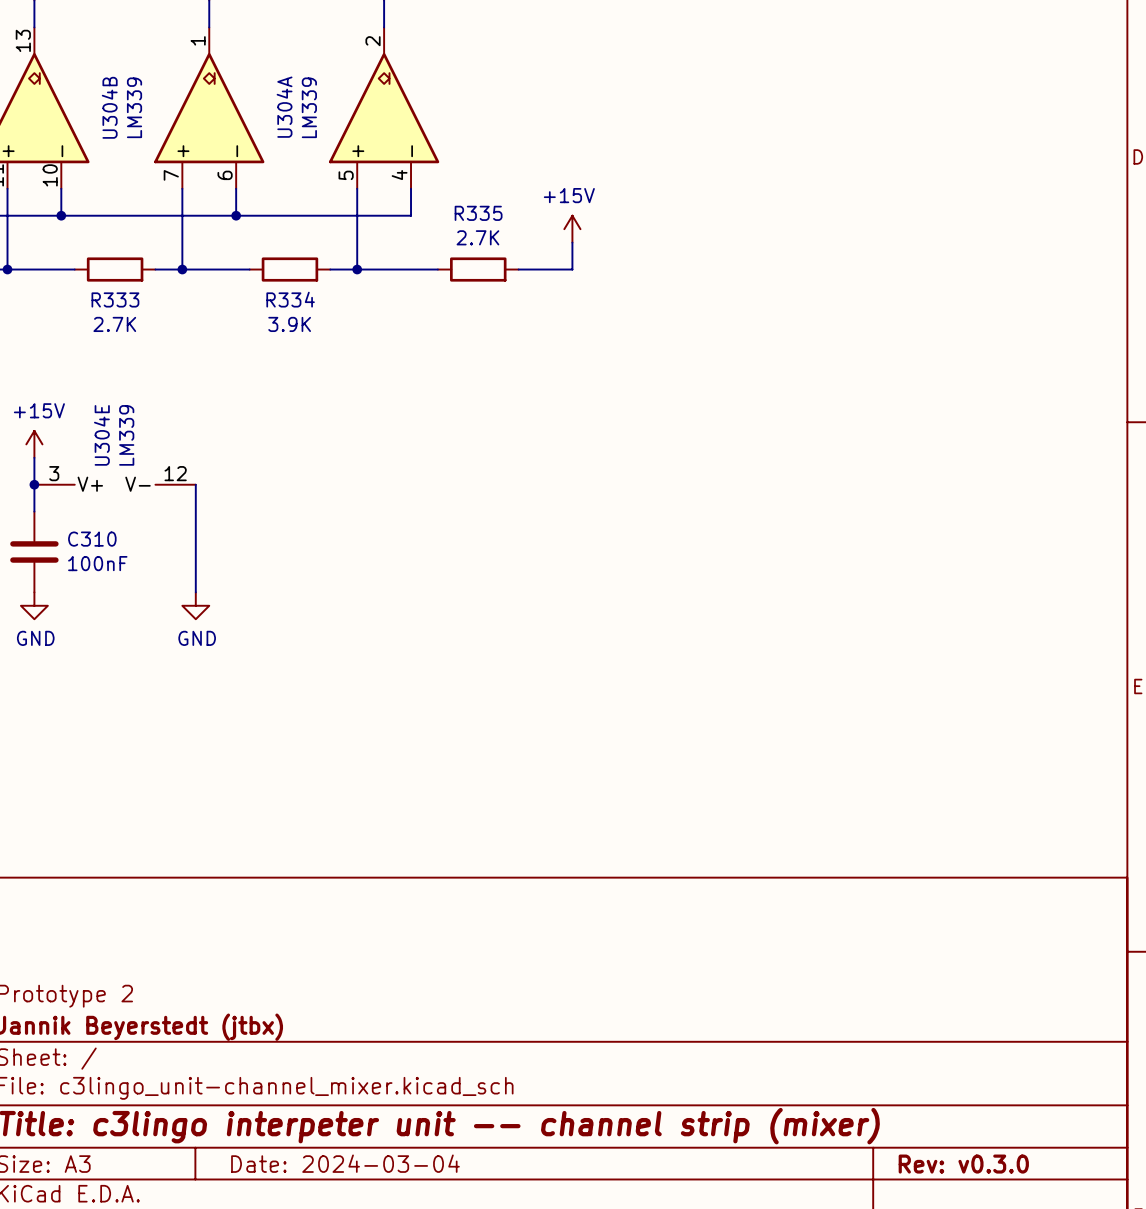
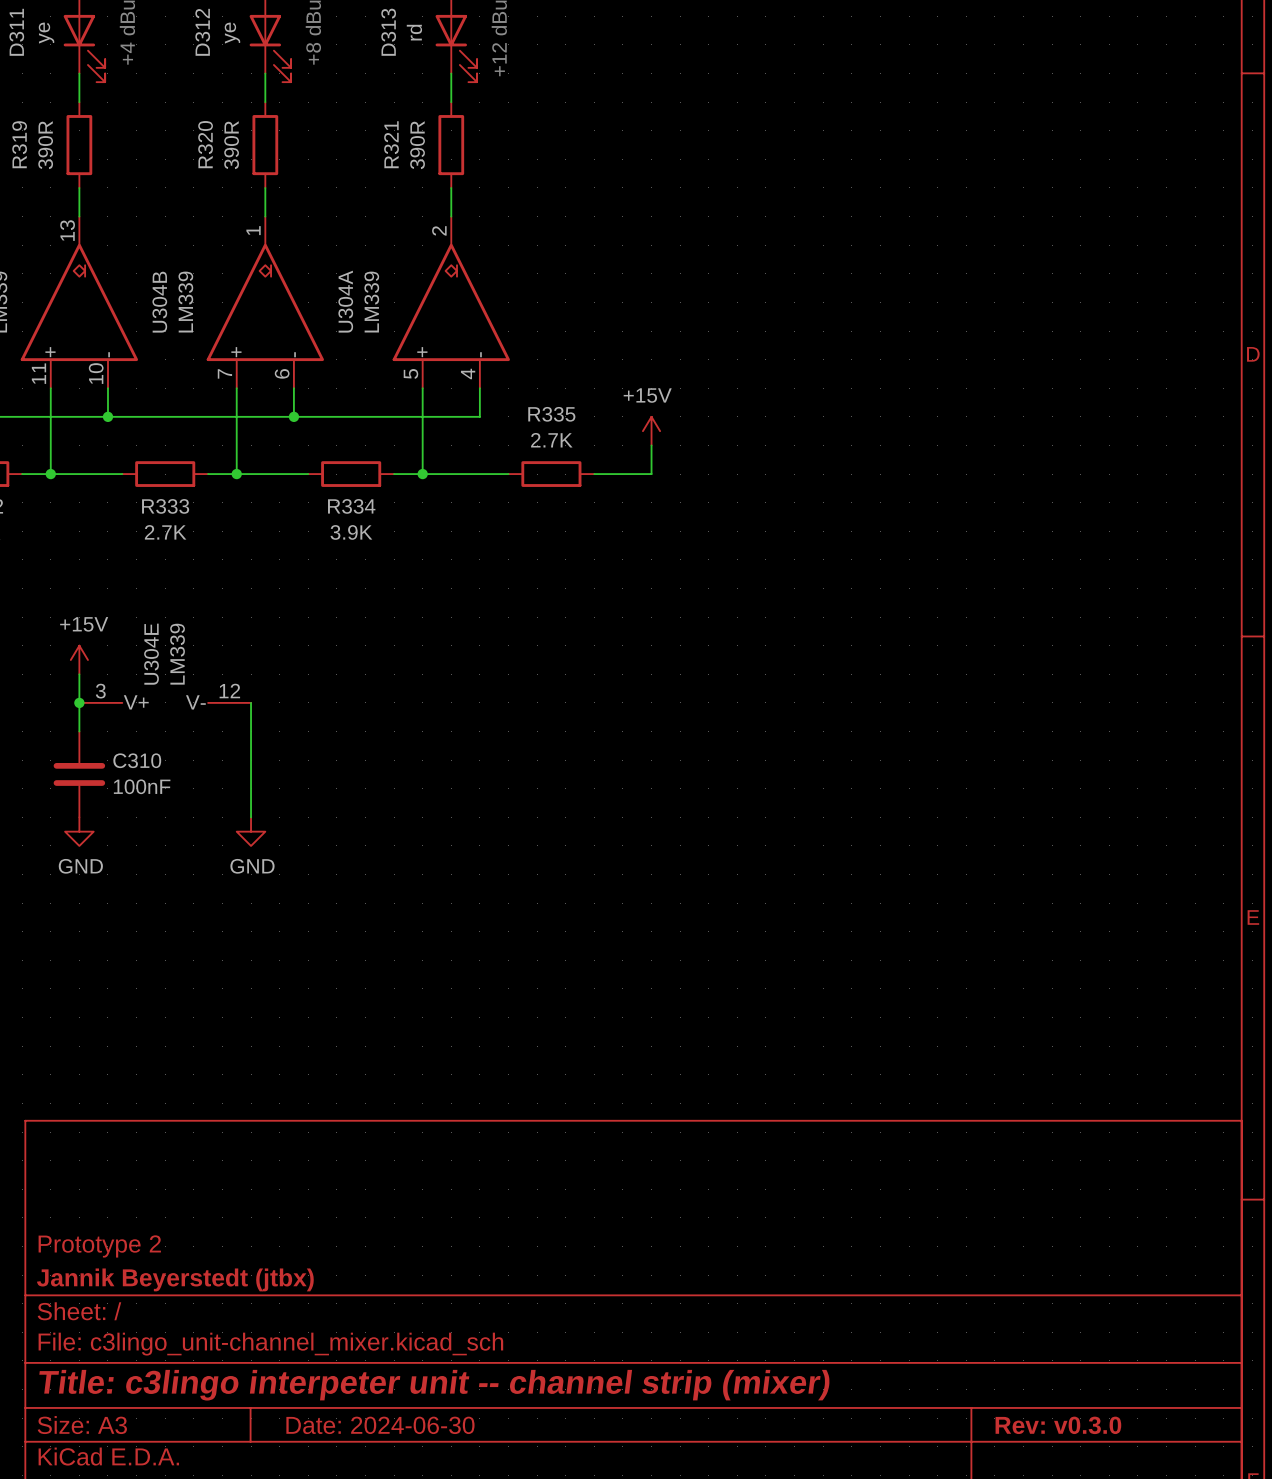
title block: Date: 2024-03-04 (345, 1163) -> Date: 2024-06-30 (380, 1425)

